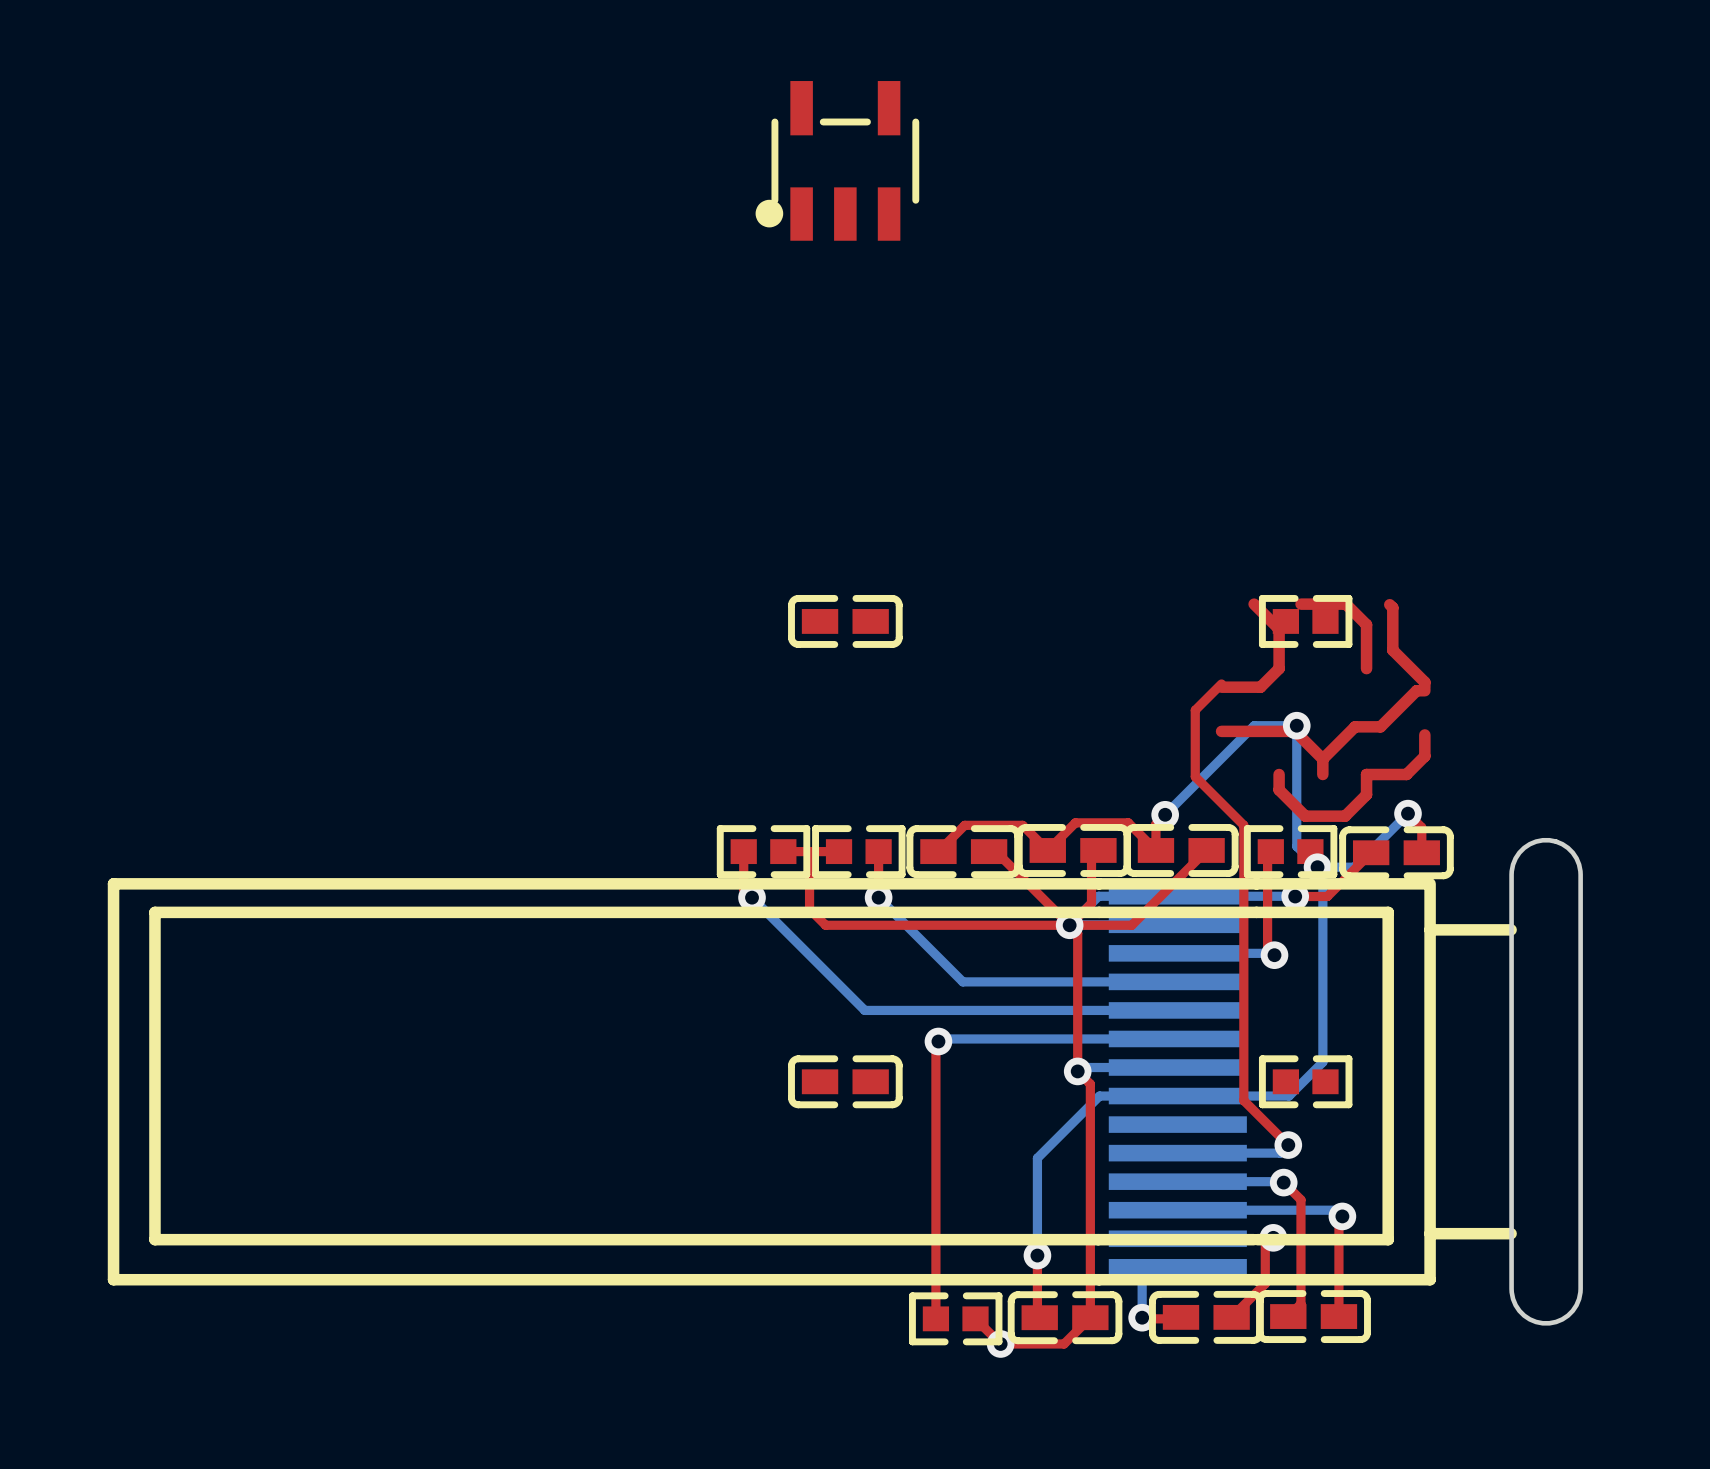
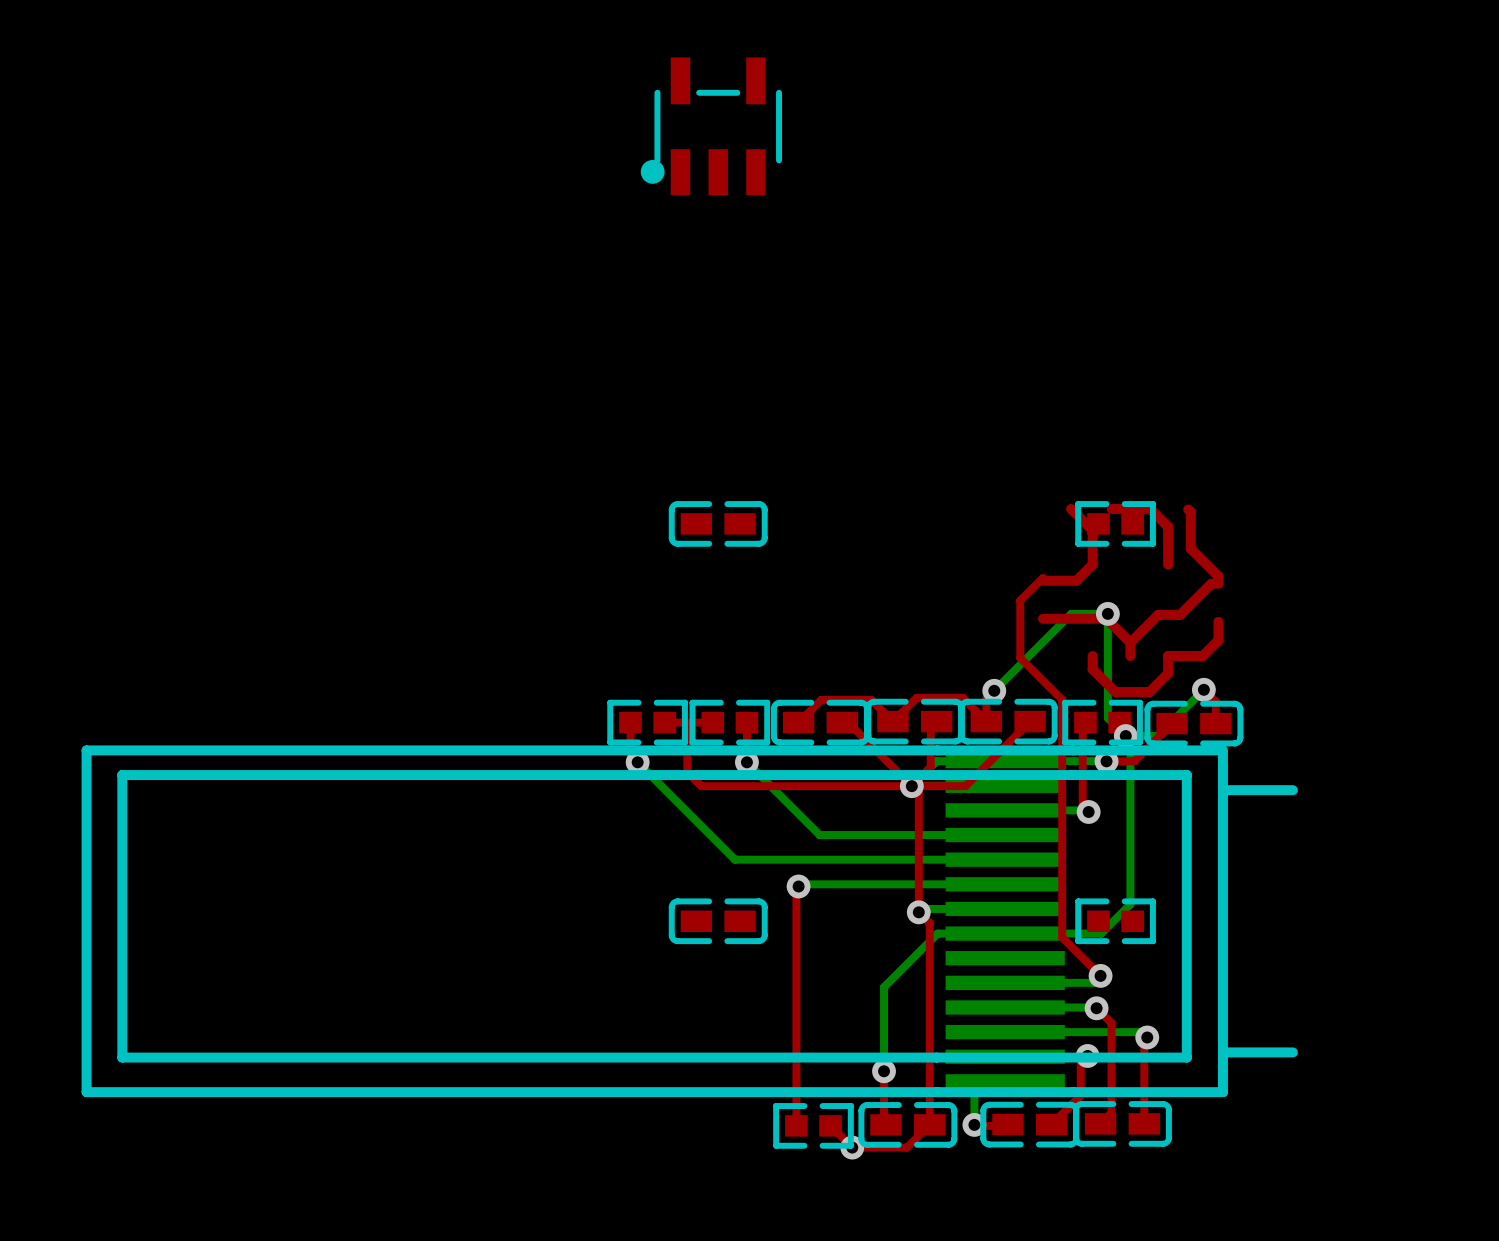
part footprint: [107, 837, 1583, 1326] -> [81, 745, 1298, 1098]

